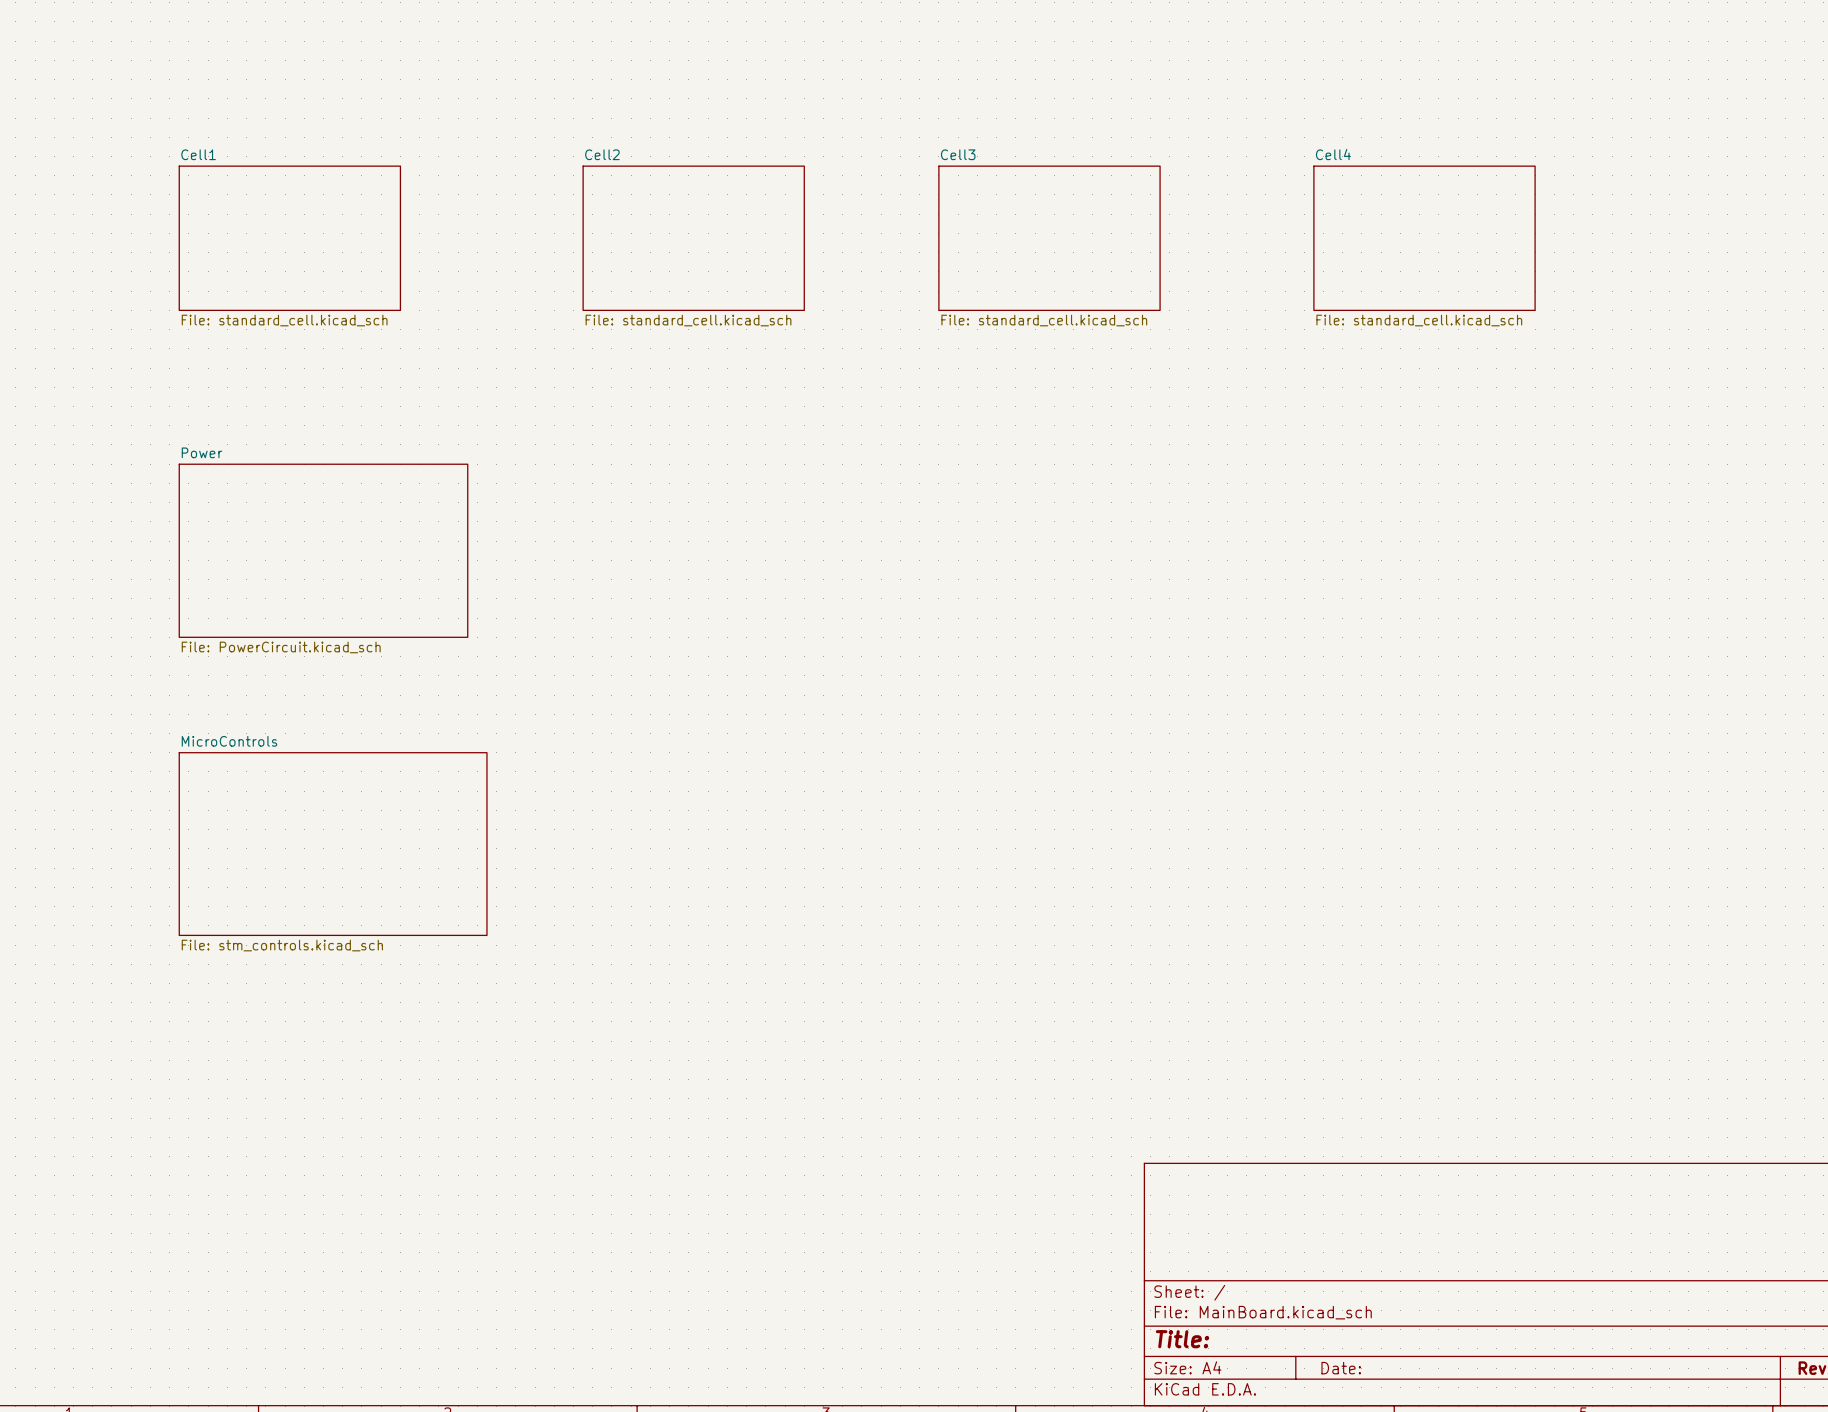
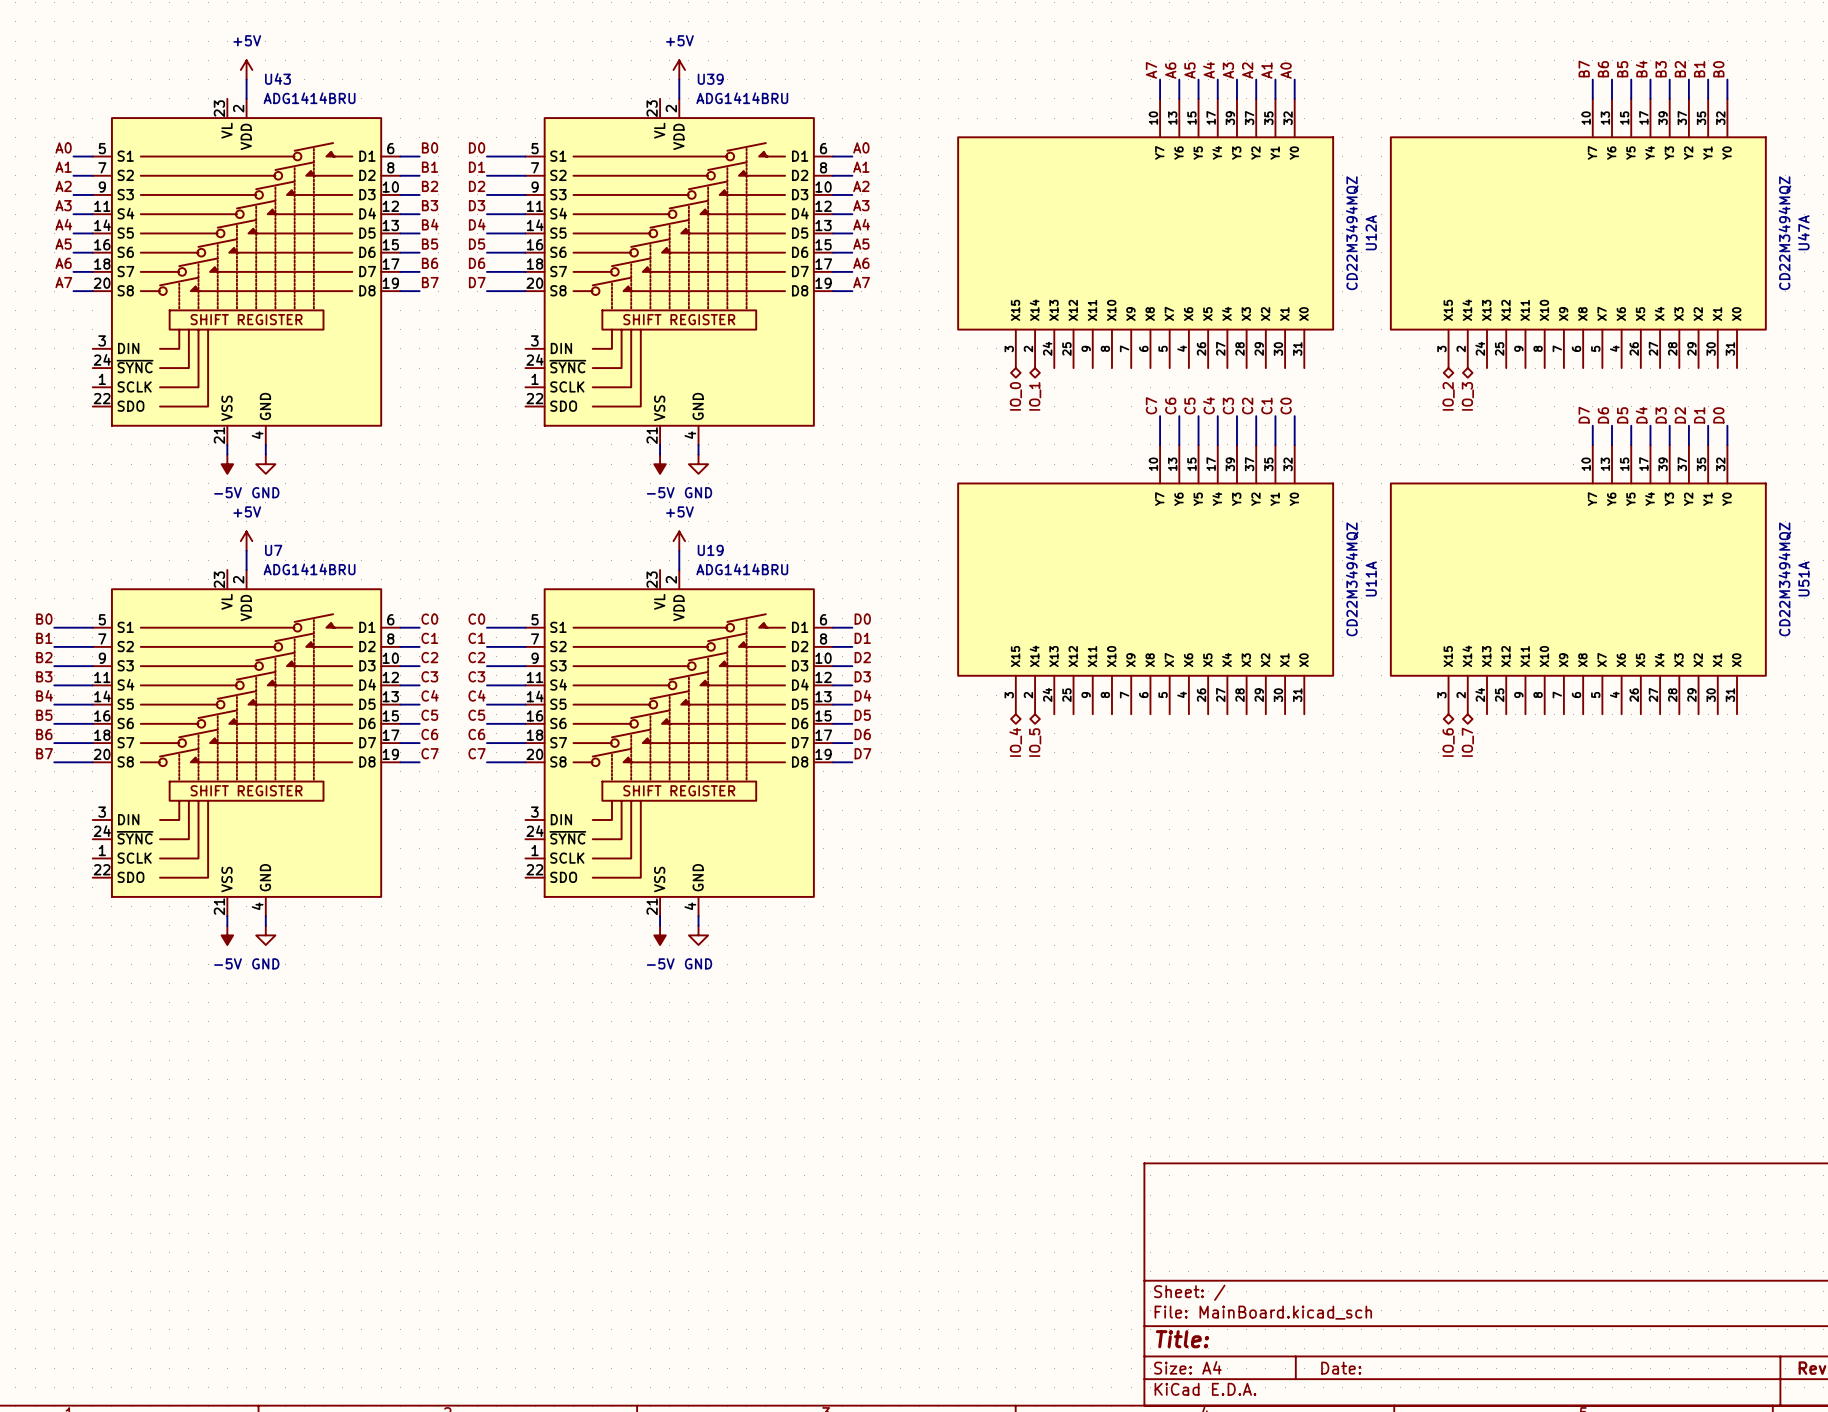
label: none -> B7 (1584, 68)
label: none -> B4 (1641, 68)
power symbol: none -> +5V (246, 69)
power symbol: none -> +5V (679, 69)
label: none -> B6 (1603, 69)
label: none -> B5 (1622, 69)
label: none -> B3 (1661, 69)
label: none -> B2 (1680, 69)
label: none -> B1 (1699, 69)
label: none -> B0 (1718, 69)
label: none -> A7 (1151, 70)
label: none -> A6 (1170, 70)
label: none -> A5 (1189, 70)
label: none -> A4 (1208, 70)
label: none -> A3 (1228, 70)
label: none -> A2 (1247, 70)
label: none -> A1 (1266, 70)
label: none -> A0 (1286, 70)
wire: none -> (246, 79) (246, 98)
wire: none -> (679, 79) (679, 98)
wire: none -> (1160, 79) (1160, 98)
wire: none -> (1179, 79) (1179, 98)
wire: none -> (1198, 79) (1198, 98)
wire: none -> (1217, 79) (1217, 98)
wire: none -> (1236, 79) (1236, 98)
wire: none -> (1256, 79) (1256, 98)
wire: none -> (1275, 79) (1275, 98)
wire: none -> (1294, 79) (1294, 98)
wire: none -> (1592, 79) (1592, 98)
wire: none -> (1612, 79) (1612, 98)
wire: none -> (1631, 79) (1631, 98)
wire: none -> (1650, 79) (1650, 98)
wire: none -> (1669, 79) (1669, 98)
wire: none -> (1688, 79) (1688, 98)
wire: none -> (1708, 79) (1708, 98)
wire: none -> (1727, 79) (1727, 98)
label: none -> A0 (63, 147)
label: none -> B0 (430, 147)
label: none -> D0 (477, 147)
label: none -> A0 (861, 147)
wire: none -> (73, 156) (92, 156)
wire: none -> (400, 156) (419, 156)
wire: none -> (486, 156) (525, 156)
wire: none -> (833, 156) (852, 156)
label: none -> A1 (63, 167)
label: none -> B1 (430, 167)
label: none -> D1 (477, 167)
label: none -> A1 (861, 167)
wire: none -> (73, 175) (92, 175)
wire: none -> (400, 175) (419, 175)
wire: none -> (486, 175) (525, 175)
wire: none -> (833, 175) (852, 175)
label: none -> A2 (63, 186)
label: none -> B2 (430, 186)
label: none -> D2 (477, 186)
label: none -> A2 (861, 186)
wire: none -> (73, 194) (92, 194)
wire: none -> (400, 194) (419, 194)
wire: none -> (486, 194) (525, 194)
wire: none -> (833, 194) (852, 194)
label: none -> A3 (63, 205)
label: none -> B3 (430, 205)
label: none -> D3 (477, 205)
label: none -> A3 (861, 205)
wire: none -> (73, 214) (92, 214)
wire: none -> (400, 214) (419, 214)
wire: none -> (486, 214) (525, 214)
wire: none -> (833, 214) (852, 214)
label: none -> A4 (63, 224)
label: none -> B4 (430, 224)
label: none -> D4 (477, 224)
label: none -> A4 (861, 224)
wire: none -> (73, 233) (92, 233)
wire: none -> (400, 233) (419, 233)
wire: none -> (486, 233) (525, 233)
wire: none -> (833, 233) (852, 233)
U12A: none -> CD22M3494MQZ (1145, 233)
U47A: none -> CD22M3494MQZ (1578, 233)
sheet Cell1: File: standard_cell.kicad_sch (289, 238) -> none
sheet Cell2: File: standard_cell.kicad_sch (693, 238) -> none
sheet Cell3: File: standard_cell.kicad_sch (1049, 238) -> none
sheet Cell4: File: standard_cell.kicad_sch (1424, 238) -> none
label: none -> A5 (63, 244)
label: none -> B5 (430, 244)
label: none -> D5 (477, 244)
label: none -> A5 (861, 244)
wire: none -> (73, 252) (92, 252)
wire: none -> (400, 252) (419, 252)
wire: none -> (486, 252) (525, 252)
wire: none -> (833, 252) (852, 252)
label: none -> A6 (63, 263)
label: none -> B6 (430, 263)
label: none -> D6 (477, 263)
label: none -> A6 (861, 263)
wire: none -> (73, 271) (92, 271)
U43: none -> ADG1414BRU (246, 271)
wire: none -> (400, 271) (419, 271)
wire: none -> (486, 271) (525, 271)
U39: none -> ADG1414BRU (679, 271)
wire: none -> (833, 271) (852, 271)
label: none -> A7 (63, 282)
label: none -> B7 (430, 282)
label: none -> D7 (477, 282)
label: none -> A7 (861, 282)
wire: none -> (73, 291) (92, 291)
wire: none -> (400, 291) (419, 291)
wire: none -> (486, 291) (525, 291)
wire: none -> (833, 291) (852, 291)
hierarchical label: none -> IO_0 (1015, 396)
hierarchical label: none -> IO_1 (1035, 396)
hierarchical label: none -> IO_2 (1448, 396)
hierarchical label: none -> IO_3 (1467, 396)
label: none -> C7 (1151, 405)
label: none -> C4 (1208, 405)
label: none -> C6 (1170, 406)
label: none -> C5 (1189, 406)
label: none -> C3 (1228, 406)
label: none -> C2 (1247, 406)
label: none -> C1 (1266, 406)
label: none -> C0 (1286, 406)
label: none -> D7 (1584, 415)
label: none -> D6 (1603, 415)
label: none -> D5 (1622, 415)
label: none -> D4 (1641, 415)
label: none -> D3 (1661, 415)
label: none -> D2 (1680, 415)
label: none -> D1 (1699, 415)
label: none -> D0 (1718, 415)
wire: none -> (1160, 416) (1160, 444)
wire: none -> (1179, 416) (1179, 444)
wire: none -> (1198, 416) (1198, 444)
wire: none -> (1217, 416) (1217, 444)
wire: none -> (1236, 416) (1236, 444)
wire: none -> (1256, 416) (1256, 444)
wire: none -> (1275, 416) (1275, 444)
wire: none -> (1294, 416) (1294, 444)
wire: none -> (1592, 425) (1592, 444)
wire: none -> (1612, 425) (1612, 444)
wire: none -> (1631, 425) (1631, 444)
wire: none -> (1650, 425) (1650, 444)
wire: none -> (1669, 425) (1669, 444)
wire: none -> (1688, 425) (1688, 444)
wire: none -> (1708, 425) (1708, 444)
wire: none -> (1727, 425) (1727, 444)
wire: none -> (227, 444) (227, 454)
wire: none -> (265, 444) (265, 454)
wire: none -> (660, 444) (660, 454)
wire: none -> (698, 444) (698, 454)
power symbol: none -> -5V (227, 464)
power symbol: none -> GND (265, 464)
power symbol: none -> -5V (660, 464)
power symbol: none -> GND (698, 464)
power symbol: none -> +5V (246, 541)
power symbol: none -> +5V (679, 541)
wire: none -> (246, 550) (246, 570)
sheet Power: File: PowerCircuit.kicad_sch (323, 550) -> none
wire: none -> (679, 550) (679, 570)
U11A: none -> CD22M3494MQZ (1145, 579)
U51A: none -> CD22M3494MQZ (1578, 579)
label: none -> B0 (44, 619)
label: none -> C0 (429, 619)
label: none -> C0 (476, 619)
label: none -> D0 (862, 619)
wire: none -> (54, 627) (92, 627)
wire: none -> (400, 627) (419, 627)
wire: none -> (486, 627) (525, 627)
wire: none -> (833, 627) (852, 627)
label: none -> B1 (44, 638)
label: none -> C1 (429, 638)
label: none -> C1 (476, 638)
label: none -> D1 (862, 638)
wire: none -> (54, 646) (92, 646)
wire: none -> (400, 646) (419, 646)
wire: none -> (486, 646) (525, 646)
wire: none -> (833, 646) (852, 646)
label: none -> B2 (44, 657)
label: none -> C2 (429, 657)
label: none -> C2 (476, 657)
label: none -> D2 (862, 657)
wire: none -> (54, 666) (92, 666)
wire: none -> (400, 666) (419, 666)
wire: none -> (486, 666) (525, 666)
wire: none -> (833, 666) (852, 666)
label: none -> B3 (44, 676)
label: none -> C3 (429, 676)
label: none -> C3 (476, 676)
label: none -> D3 (862, 676)
wire: none -> (54, 685) (92, 685)
wire: none -> (400, 685) (419, 685)
wire: none -> (486, 685) (525, 685)
wire: none -> (833, 685) (852, 685)
label: none -> B4 (44, 695)
label: none -> C4 (430, 695)
label: none -> C4 (477, 695)
label: none -> D4 (862, 695)
wire: none -> (54, 704) (92, 704)
wire: none -> (400, 704) (419, 704)
wire: none -> (486, 704) (525, 704)
wire: none -> (833, 704) (852, 704)
label: none -> B5 (44, 715)
label: none -> C5 (429, 715)
label: none -> C5 (476, 715)
label: none -> D5 (862, 715)
wire: none -> (54, 723) (92, 723)
wire: none -> (400, 723) (419, 723)
wire: none -> (486, 723) (525, 723)
wire: none -> (833, 723) (852, 723)
label: none -> B6 (44, 734)
label: none -> C6 (429, 734)
label: none -> C6 (476, 734)
label: none -> D6 (862, 734)
hierarchical label: none -> IO_4 (1015, 742)
hierarchical label: none -> IO_5 (1035, 742)
hierarchical label: none -> IO_6 (1448, 742)
hierarchical label: none -> IO_7 (1467, 742)
wire: none -> (54, 743) (92, 743)
U7: none -> ADG1414BRU (246, 743)
wire: none -> (400, 743) (419, 743)
wire: none -> (486, 743) (525, 743)
U19: none -> ADG1414BRU (679, 743)
wire: none -> (833, 743) (852, 743)
label: none -> B7 (44, 753)
label: none -> C7 (430, 753)
label: none -> C7 (477, 753)
label: none -> D7 (862, 753)
wire: none -> (54, 762) (92, 762)
wire: none -> (400, 762) (419, 762)
wire: none -> (486, 762) (525, 762)
wire: none -> (833, 762) (852, 762)
sheet MicroControls: File: stm_controls.kicad_sch (333, 844) -> none
wire: none -> (227, 916) (227, 925)
wire: none -> (265, 916) (265, 925)
wire: none -> (660, 916) (660, 925)
wire: none -> (698, 916) (698, 925)
power symbol: none -> -5V (227, 935)
power symbol: none -> GND (265, 935)
power symbol: none -> -5V (660, 935)
power symbol: none -> GND (698, 935)

